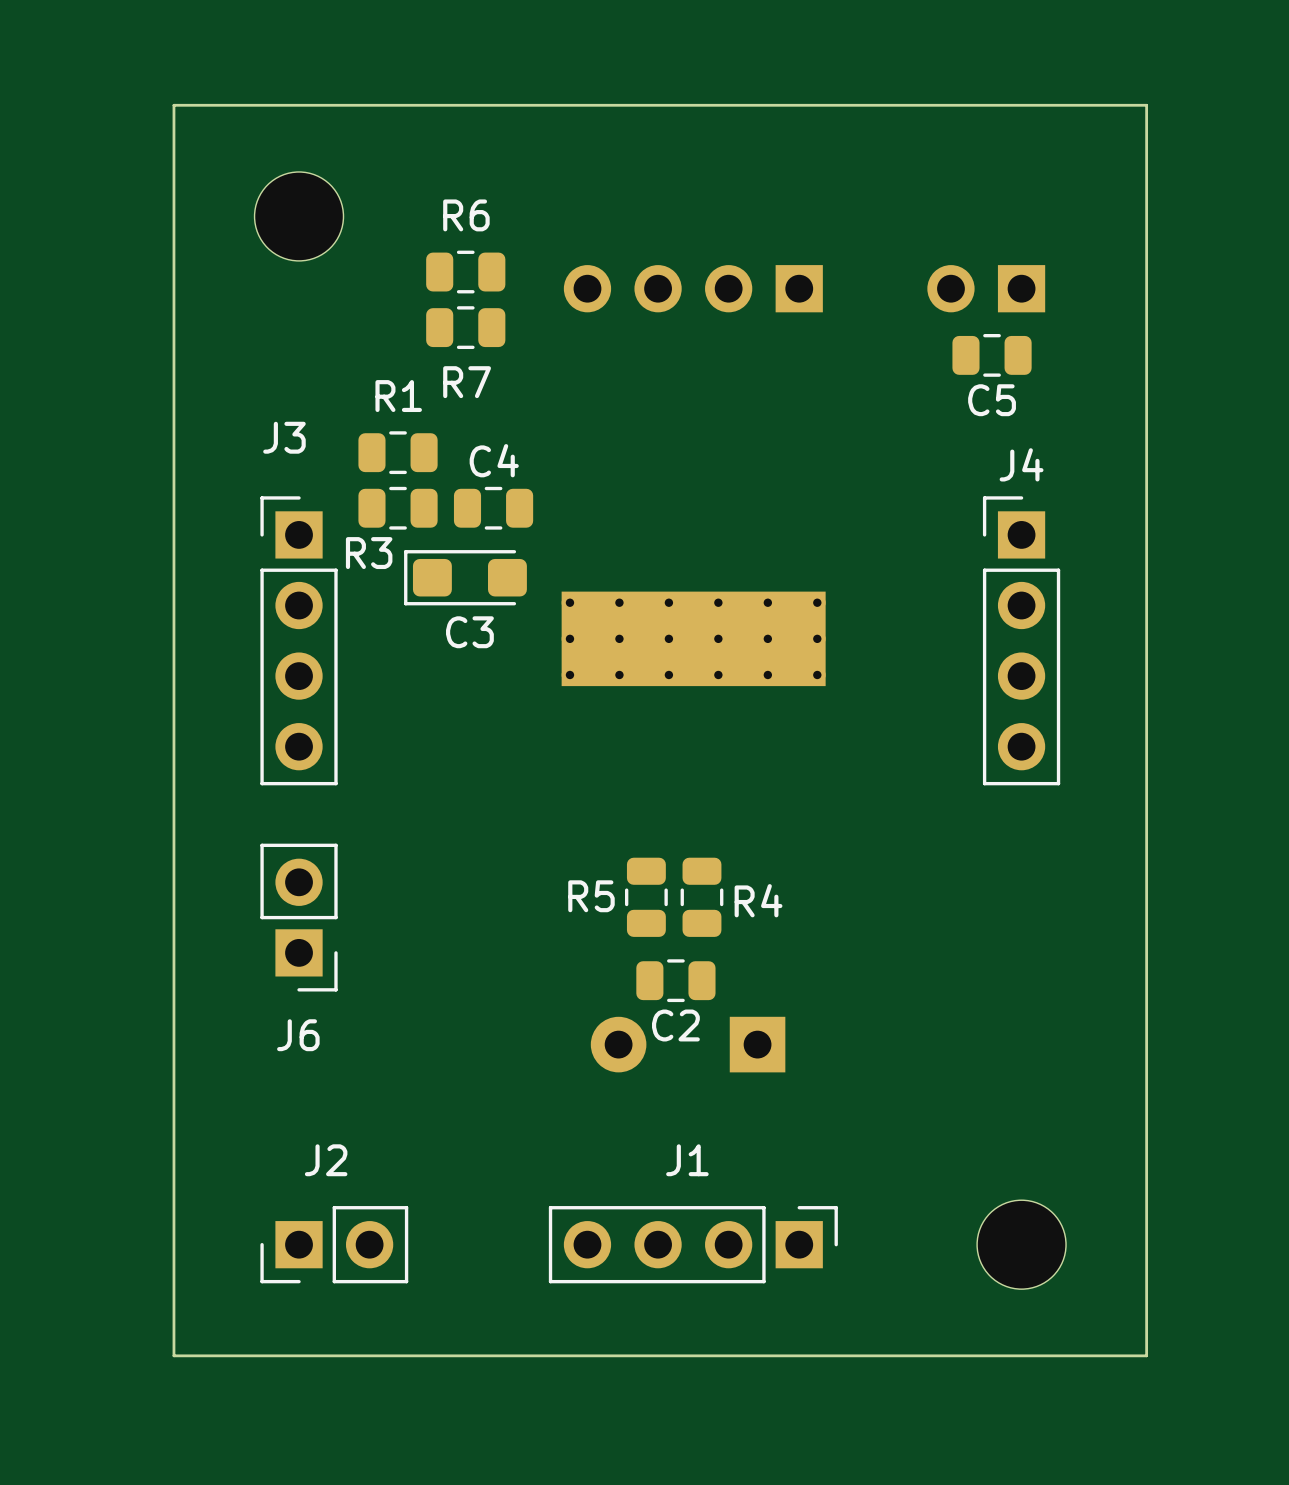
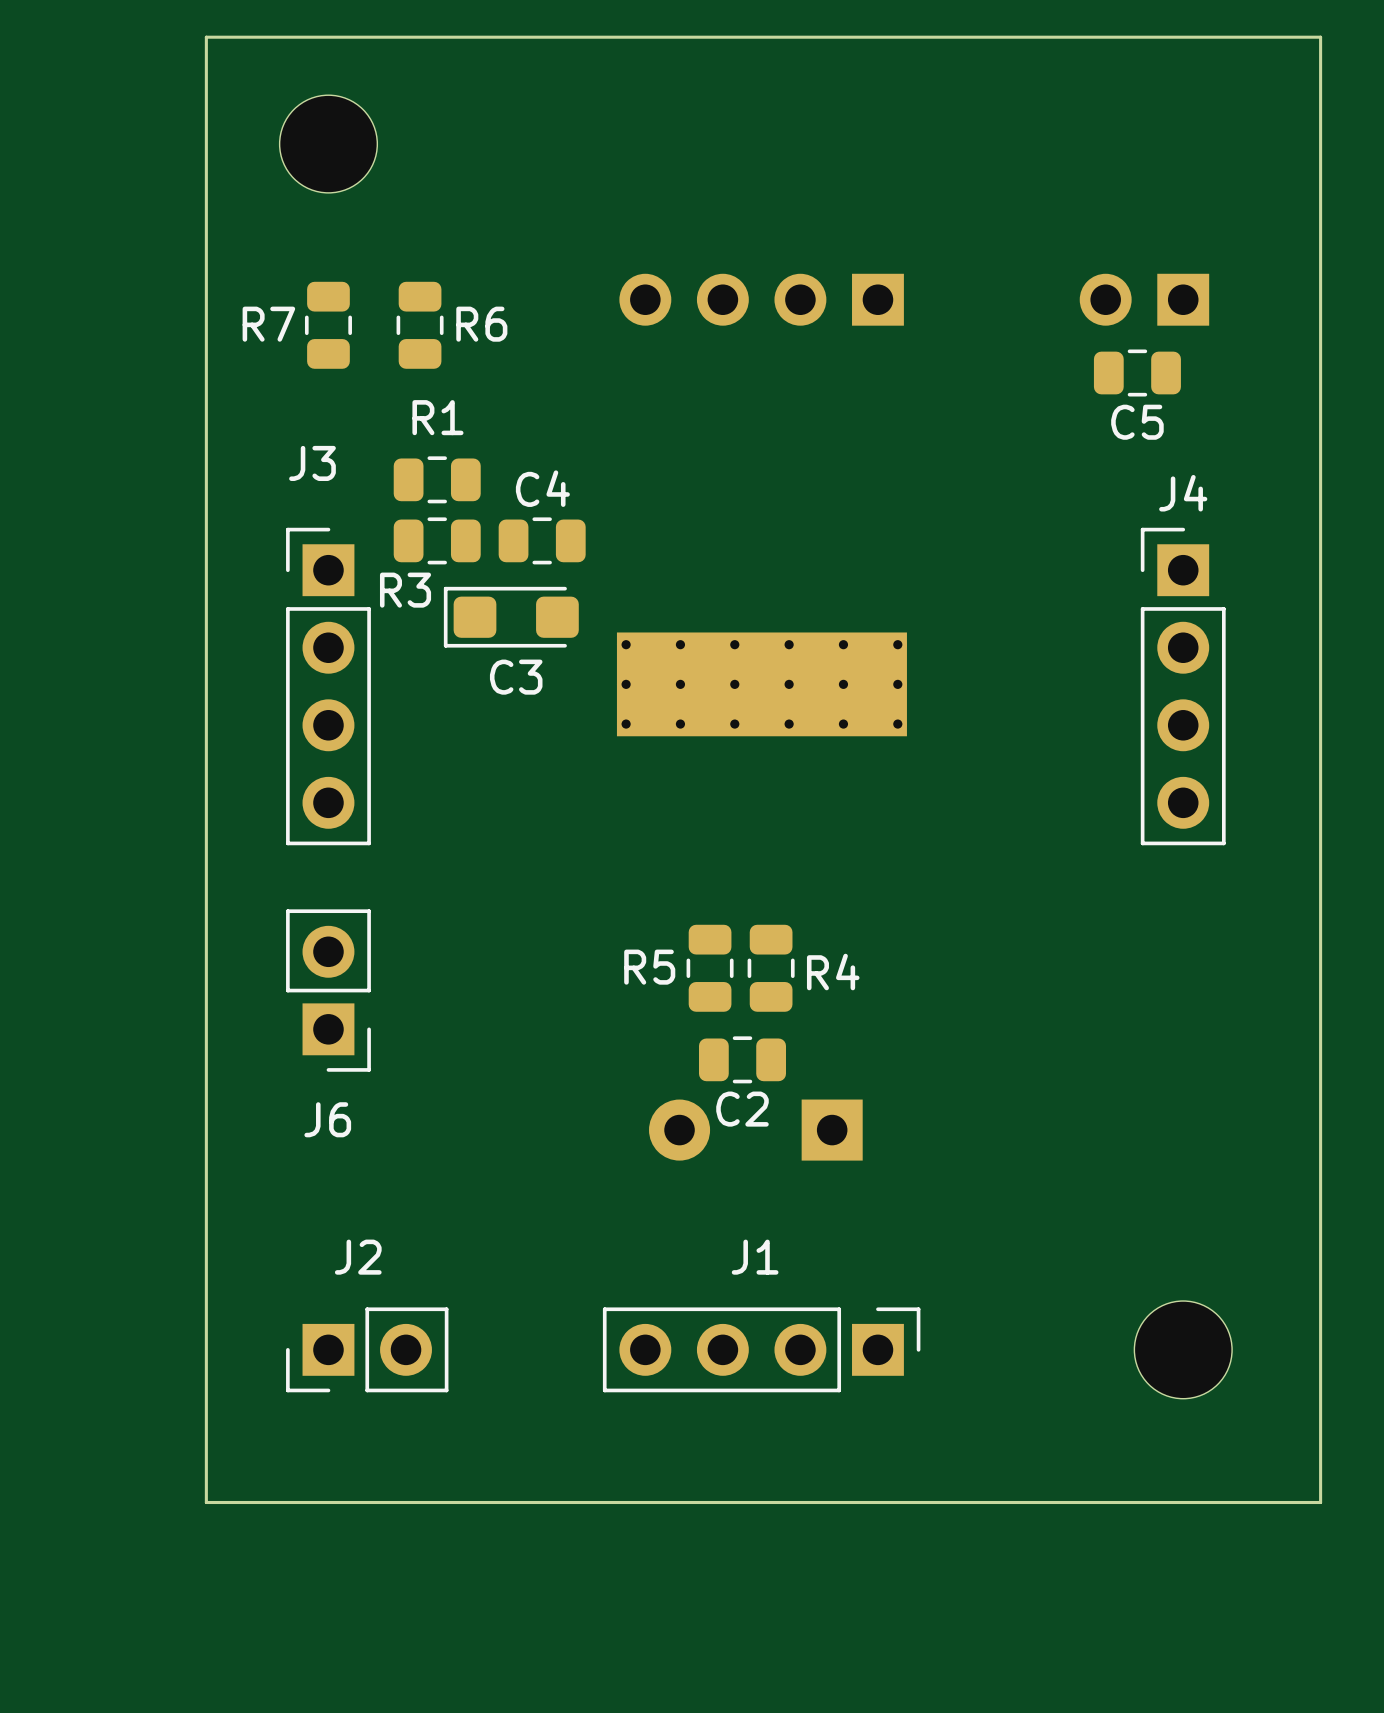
board edge: (1146, 105) (1146, 1355) (173, 1355) (173, 105) (1146, 105) -> (1320, 37) (1320, 1502) (206, 1502) (206, 37) (1320, 37)
part position: (299, 216) -> (328, 144)
R7 rotation: 0° (465, 272) -> 90° clockwise (328, 325)
R7 position: (465, 272) -> (328, 325)
part position: (986, 288) -> (1144, 299)
R6 rotation: 0° (465, 327) -> 90° clockwise (420, 325)
R6 position: (465, 327) -> (420, 325)
C5 position: (992, 355) -> (1137, 373)
R7 name position: R7 (467, 382) -> R7 (268, 324)
J4 position: (1021, 640) -> (1183, 686)
part position: (1021, 1244) -> (1183, 1349)

